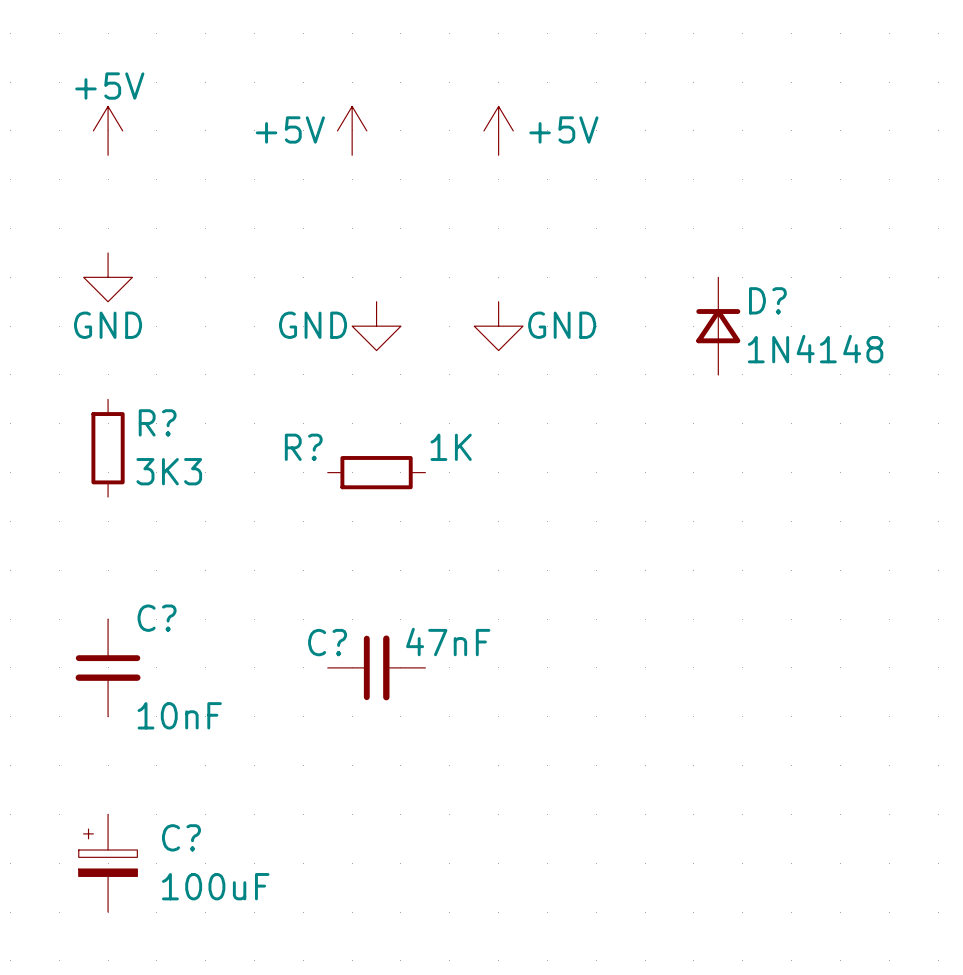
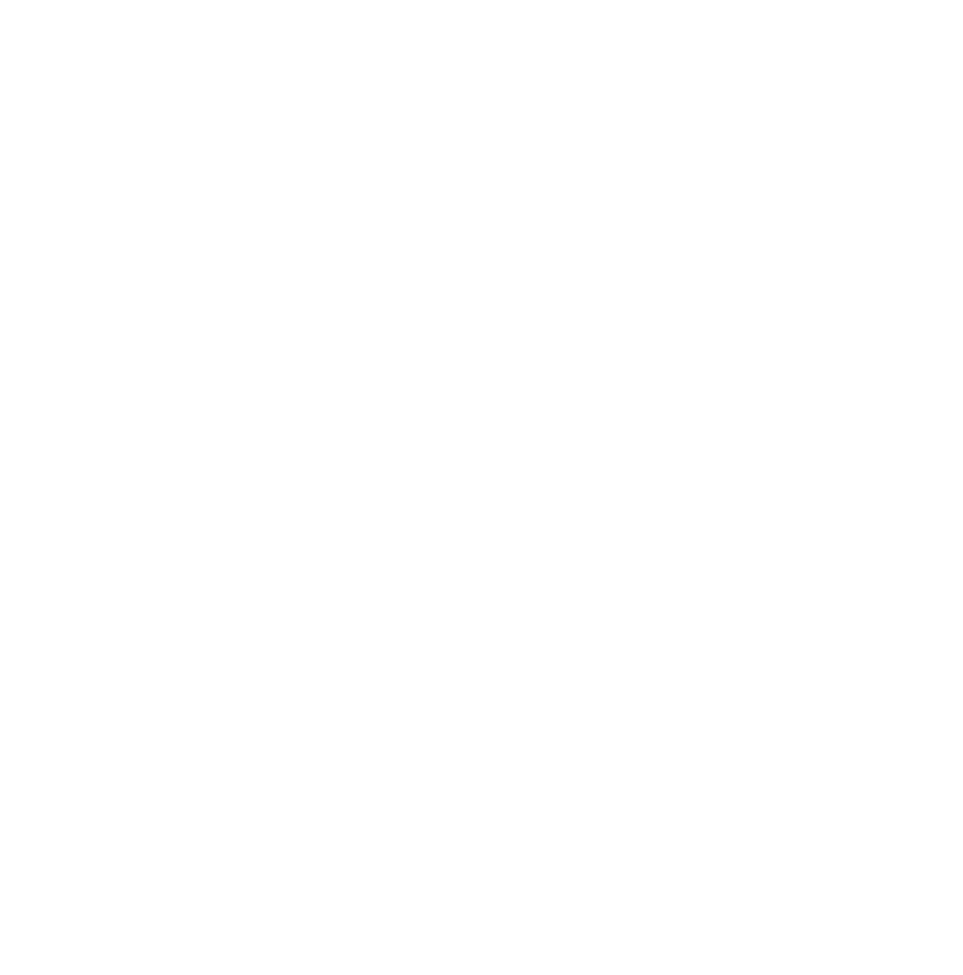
power symbol: +5V (108, 130) -> none
power symbol: +5V (352, 130) -> none
power symbol: +5V (498, 130) -> none
power symbol: GND (108, 277) -> none
power symbol: GND (376, 326) -> none
power symbol: GND (498, 326) -> none
D?: 1N4148 (718, 326) -> none
R?: 3K3 (108, 448) -> none
R?: 1K (376, 472) -> none
C?: 10nF (108, 667) -> none
C?: 47nF (376, 667) -> none
C?: 100uF (108, 863) -> none

